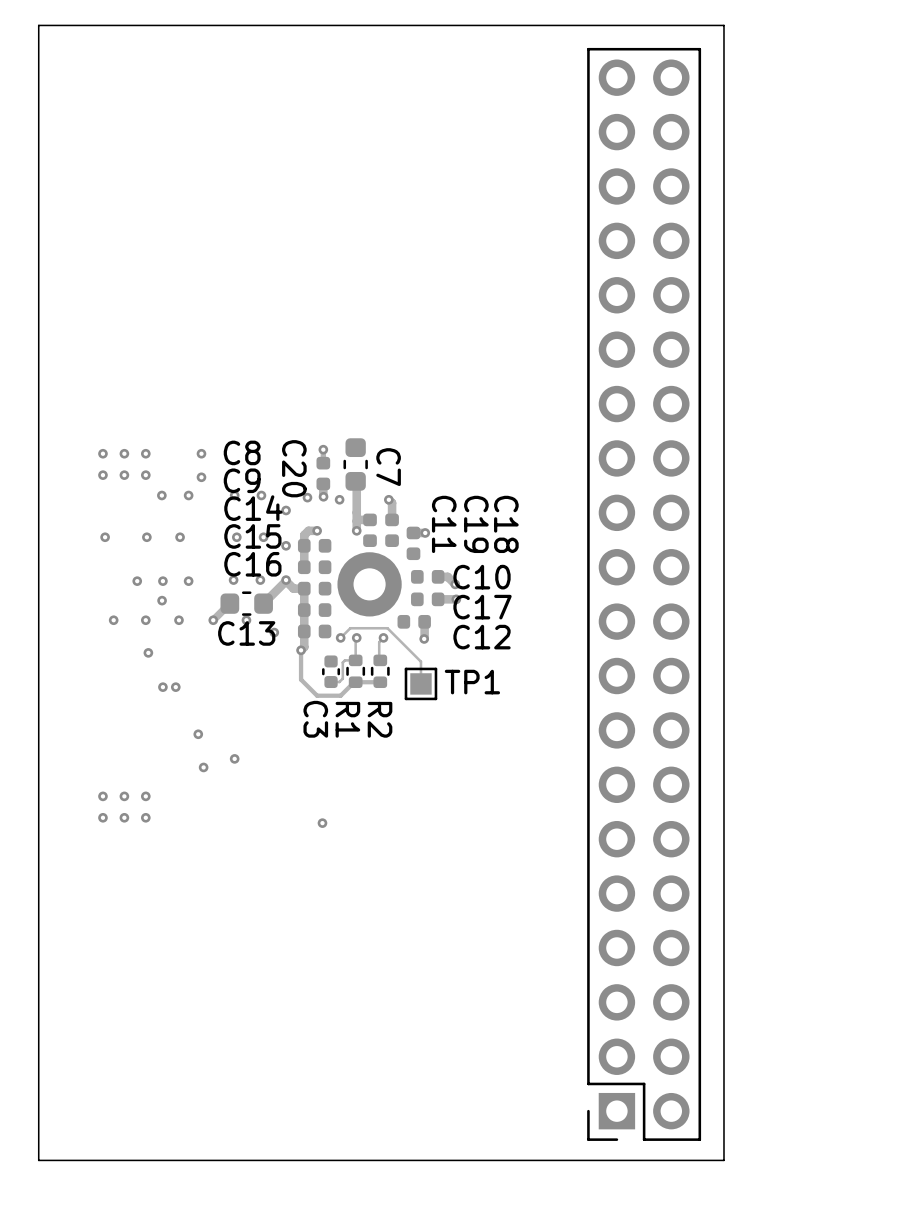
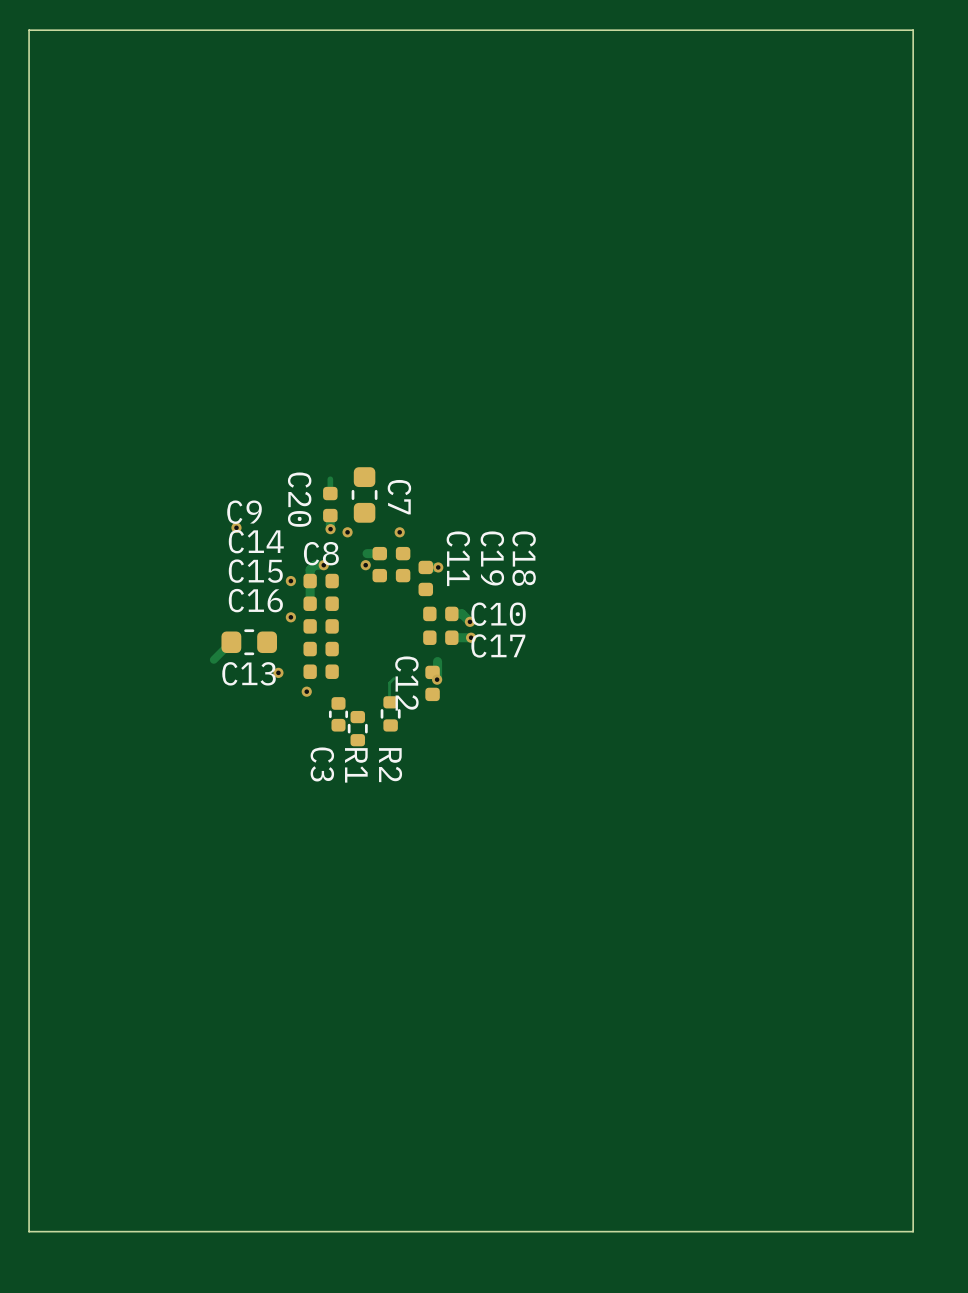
board edge: (723, 25) (723, 1160) -> (754, 30) (913, 30) (913, 1231) (754, 1231)
via: (323, 449) -> none
C8 name position: C8 (242, 452) -> C8 (321, 553)
via: (102, 453) -> none
via: (124, 453) -> none
via: (145, 453) -> none
via: (201, 453) -> none
via: (102, 475) -> none
via: (124, 475) -> none
via: (145, 475) -> none
via: (201, 477) -> none
track: (355, 481) (356, 530) -> none
via: (161, 495) -> none
via: (188, 495) -> none
via: (261, 495) -> none
via: (307, 497) -> none
track: (388, 499) (392, 502) (392, 519) -> none
via: (286, 510) -> none
via: (105, 537) -> none
via: (146, 537) -> none
via: (180, 537) -> none
via: (236, 537) -> none
via: (263, 537) -> none
via: (233, 580) -> none
via: (260, 580) -> none
via: (137, 581) -> none
via: (162, 581) -> none
via: (188, 581) -> none
track: (286, 581) (293, 588) (304, 588) (304, 647) (301, 650) (301, 679) (317, 695) (340, 695) (354, 682) (380, 682) -> none
track: (286, 581) (263, 603) -> none
via: (369, 584) -> none
part: (644, 594) -> none
via: (162, 600) -> none
via: (113, 620) -> none
via: (145, 620) -> none
via: (178, 620) -> none
via: (213, 620) -> none
via: (246, 620) -> none
C12 rotation: 0° (414, 621) -> 90° clockwise (432, 683)
C12 position: (414, 621) -> (432, 683)
track: (340, 637) (350, 628) (387, 628) (420, 661) (420, 683) -> none
via: (340, 637) -> none
track: (356, 637) (355, 660) (344, 660) (342, 662) (342, 678) (339, 682) (331, 682) -> none
via: (356, 637) -> none
via: (383, 637) -> none
C12 name position: C12 (482, 637) -> C12 (406, 683)
via: (148, 652) -> none
R1 position: (355, 671) -> (357, 728)
TP1: (420, 683) -> none
via: (162, 687) -> none
via: (175, 687) -> none
via: (198, 734) -> none
via: (234, 758) -> none
via: (203, 767) -> none
via: (102, 796) -> none
via: (124, 796) -> none
via: (145, 796) -> none
via: (102, 817) -> none
via: (124, 817) -> none
via: (145, 817) -> none
via: (322, 823) -> none

